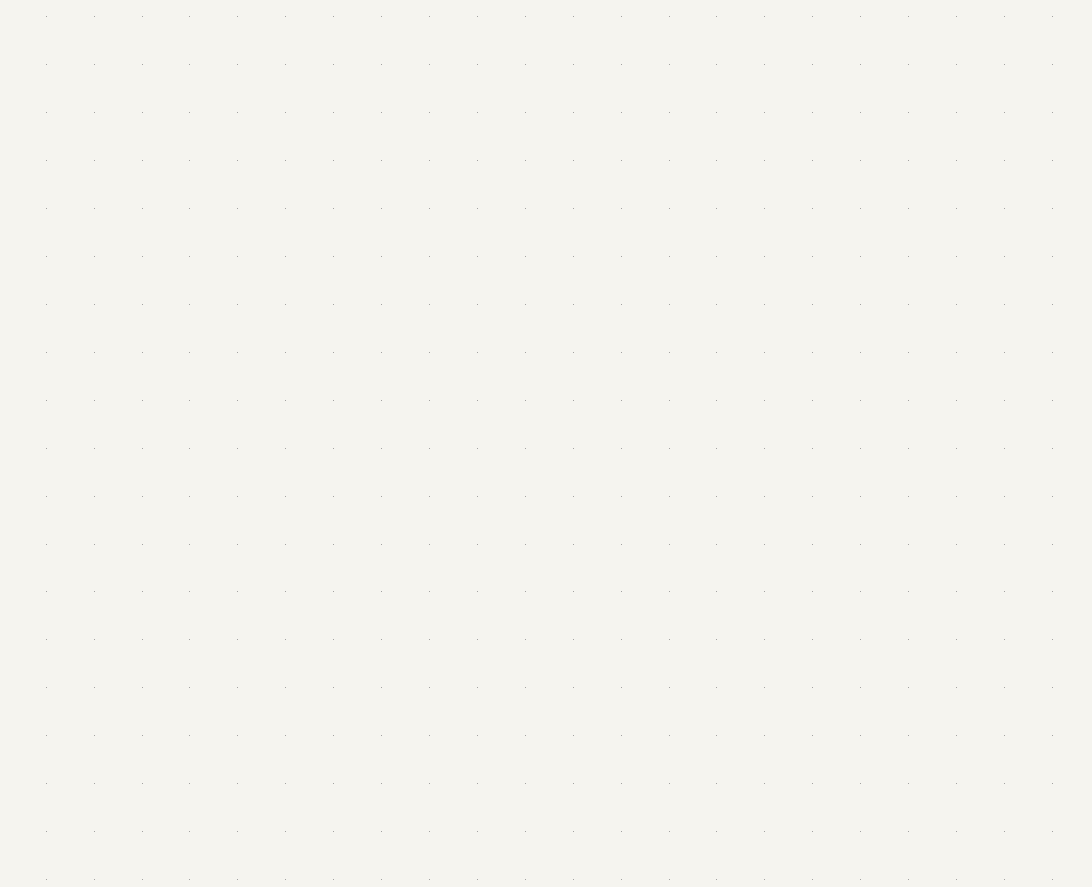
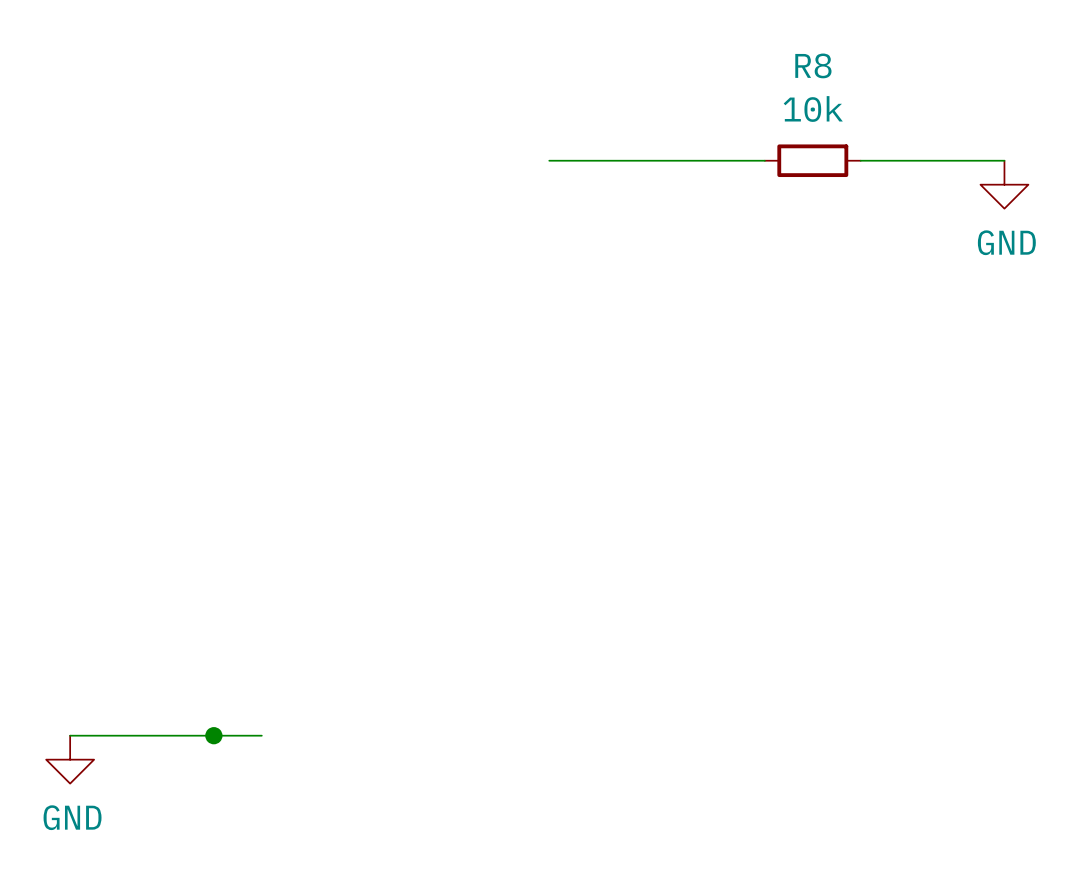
wire: none -> (549, 160) (764, 160)
R8: none -> 10k (812, 160)
wire: none -> (860, 160) (1004, 160)
power symbol: none -> GND (1004, 184)
wire: none -> (70, 735) (261, 735)
junction: none -> (213, 735)
power symbol: none -> GND (70, 759)

